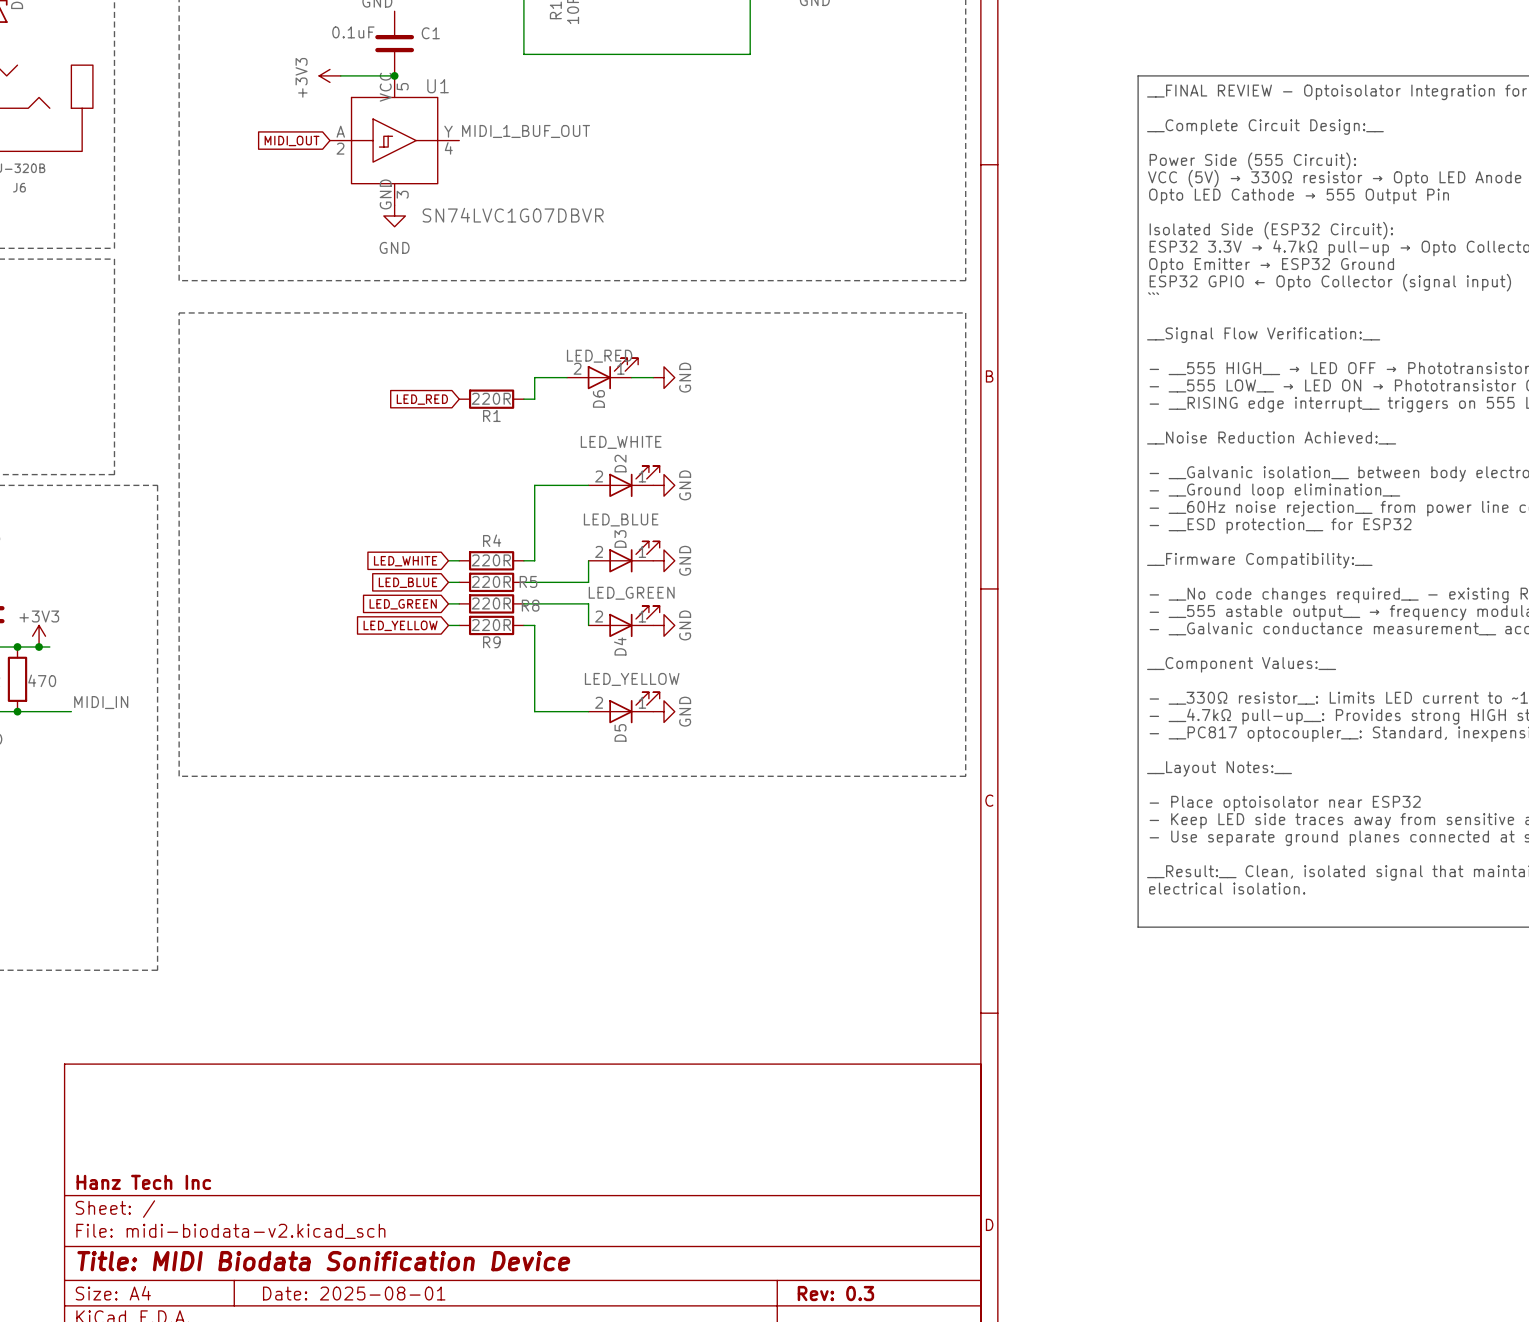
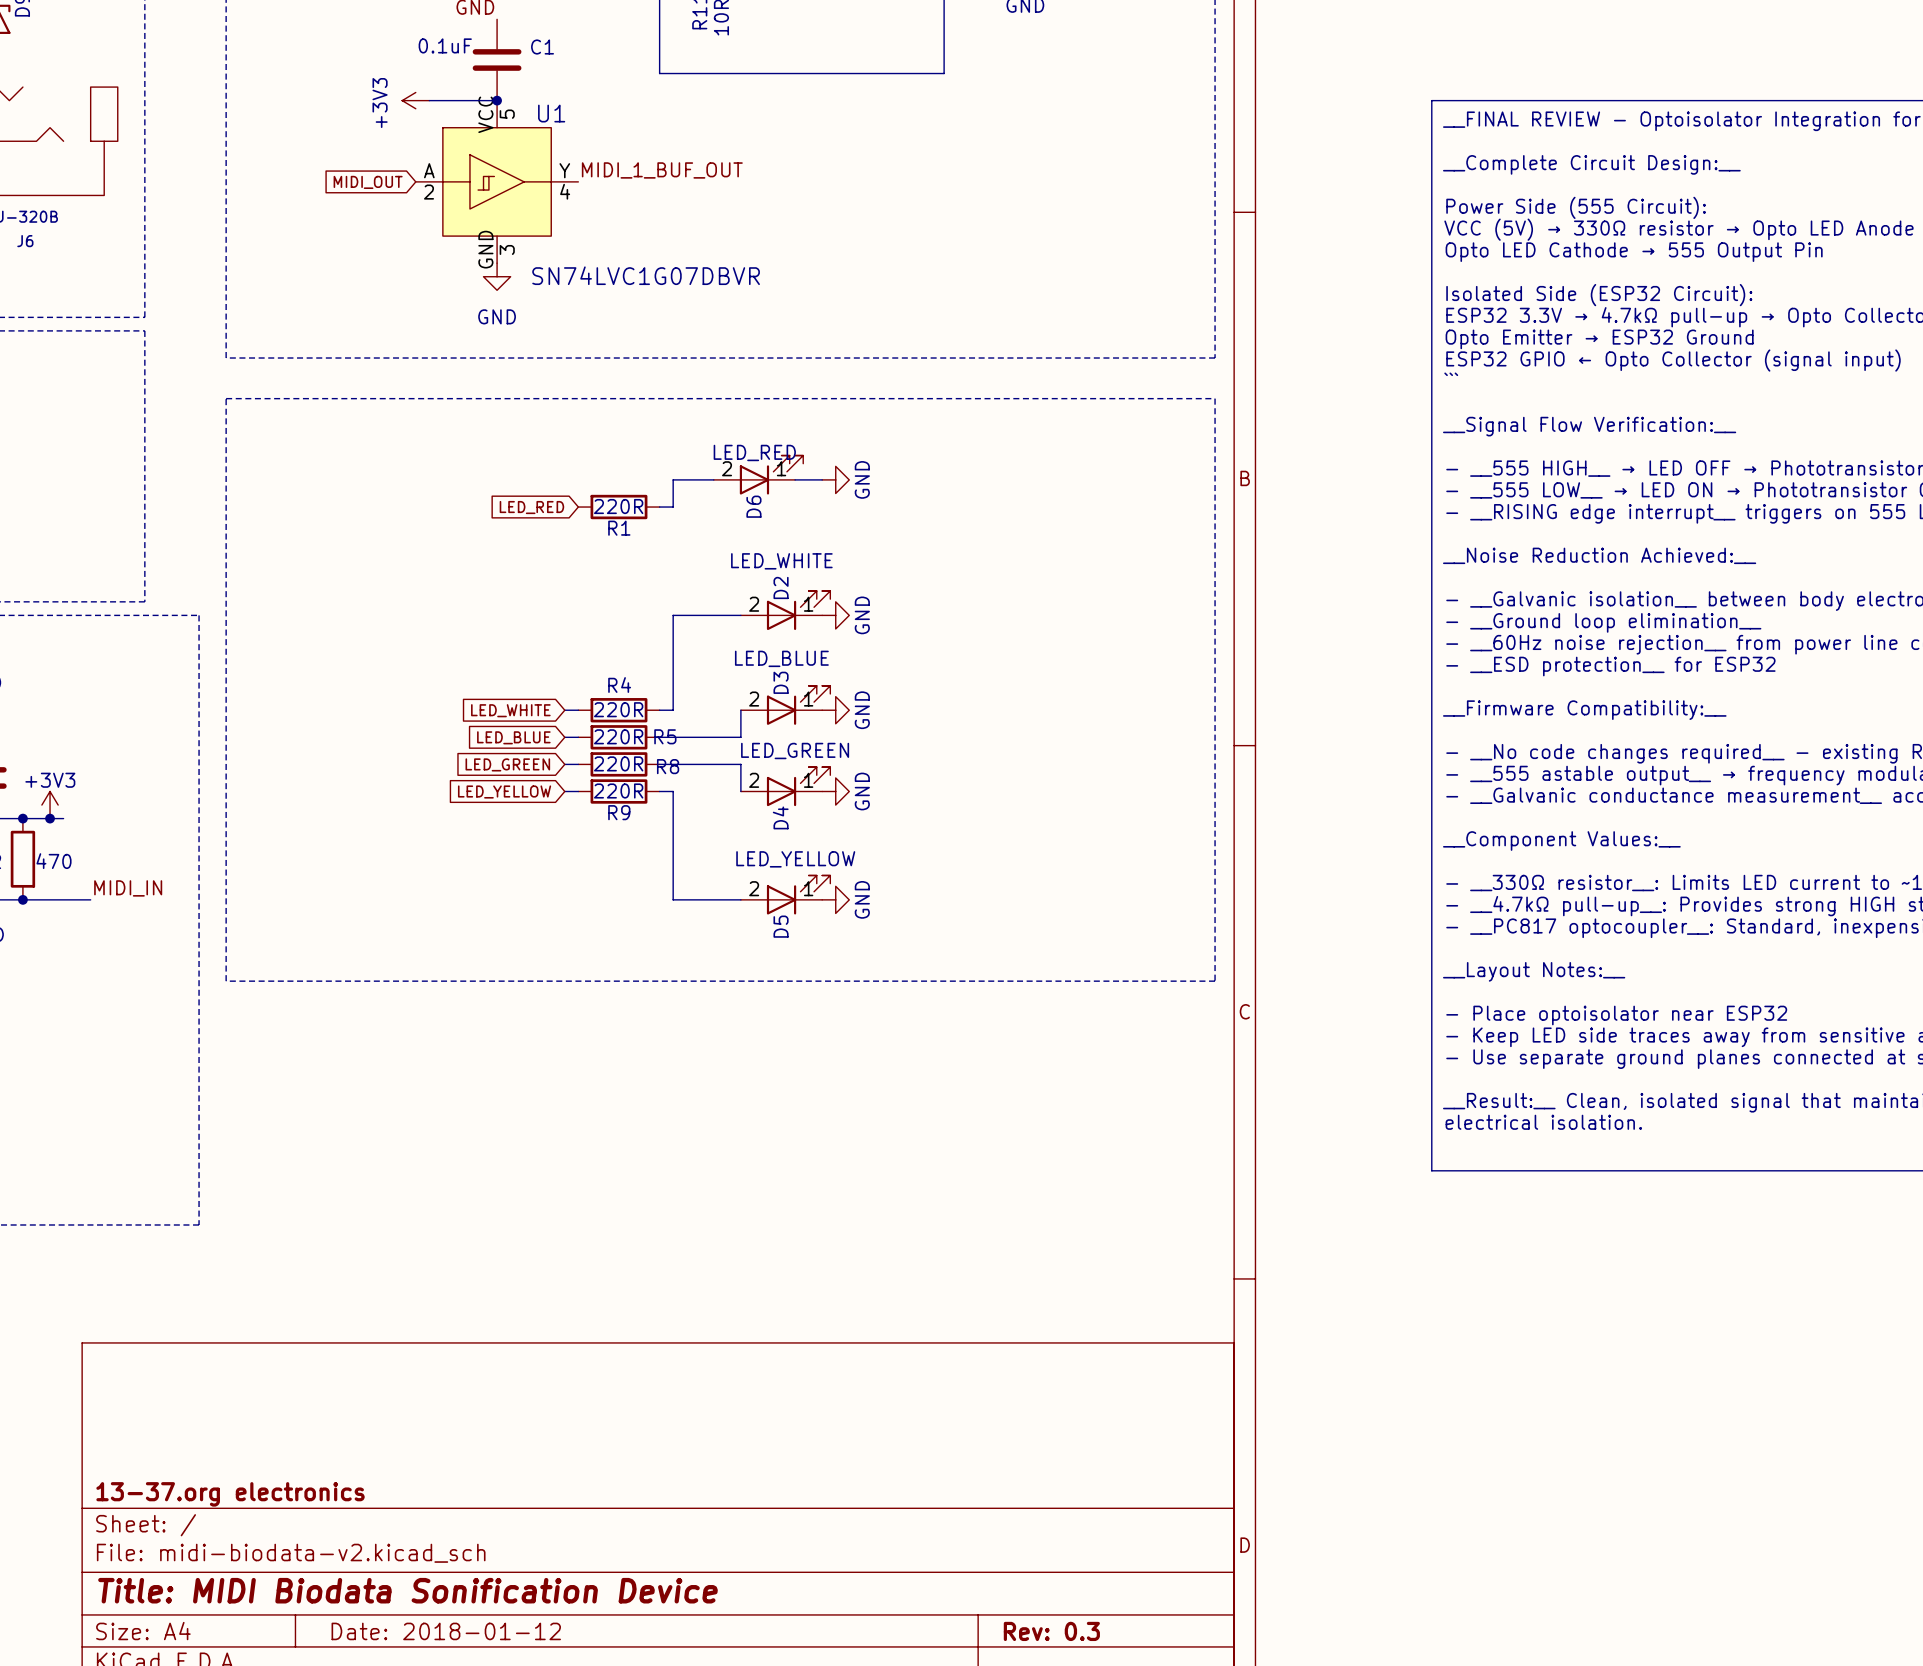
title block: Hanz Tech Inc (143, 1182) -> 13-37.org electronics (230, 1494)
title block: Date: 2025-08-01 (354, 1293) -> Date: 2018-01-12 (446, 1631)

